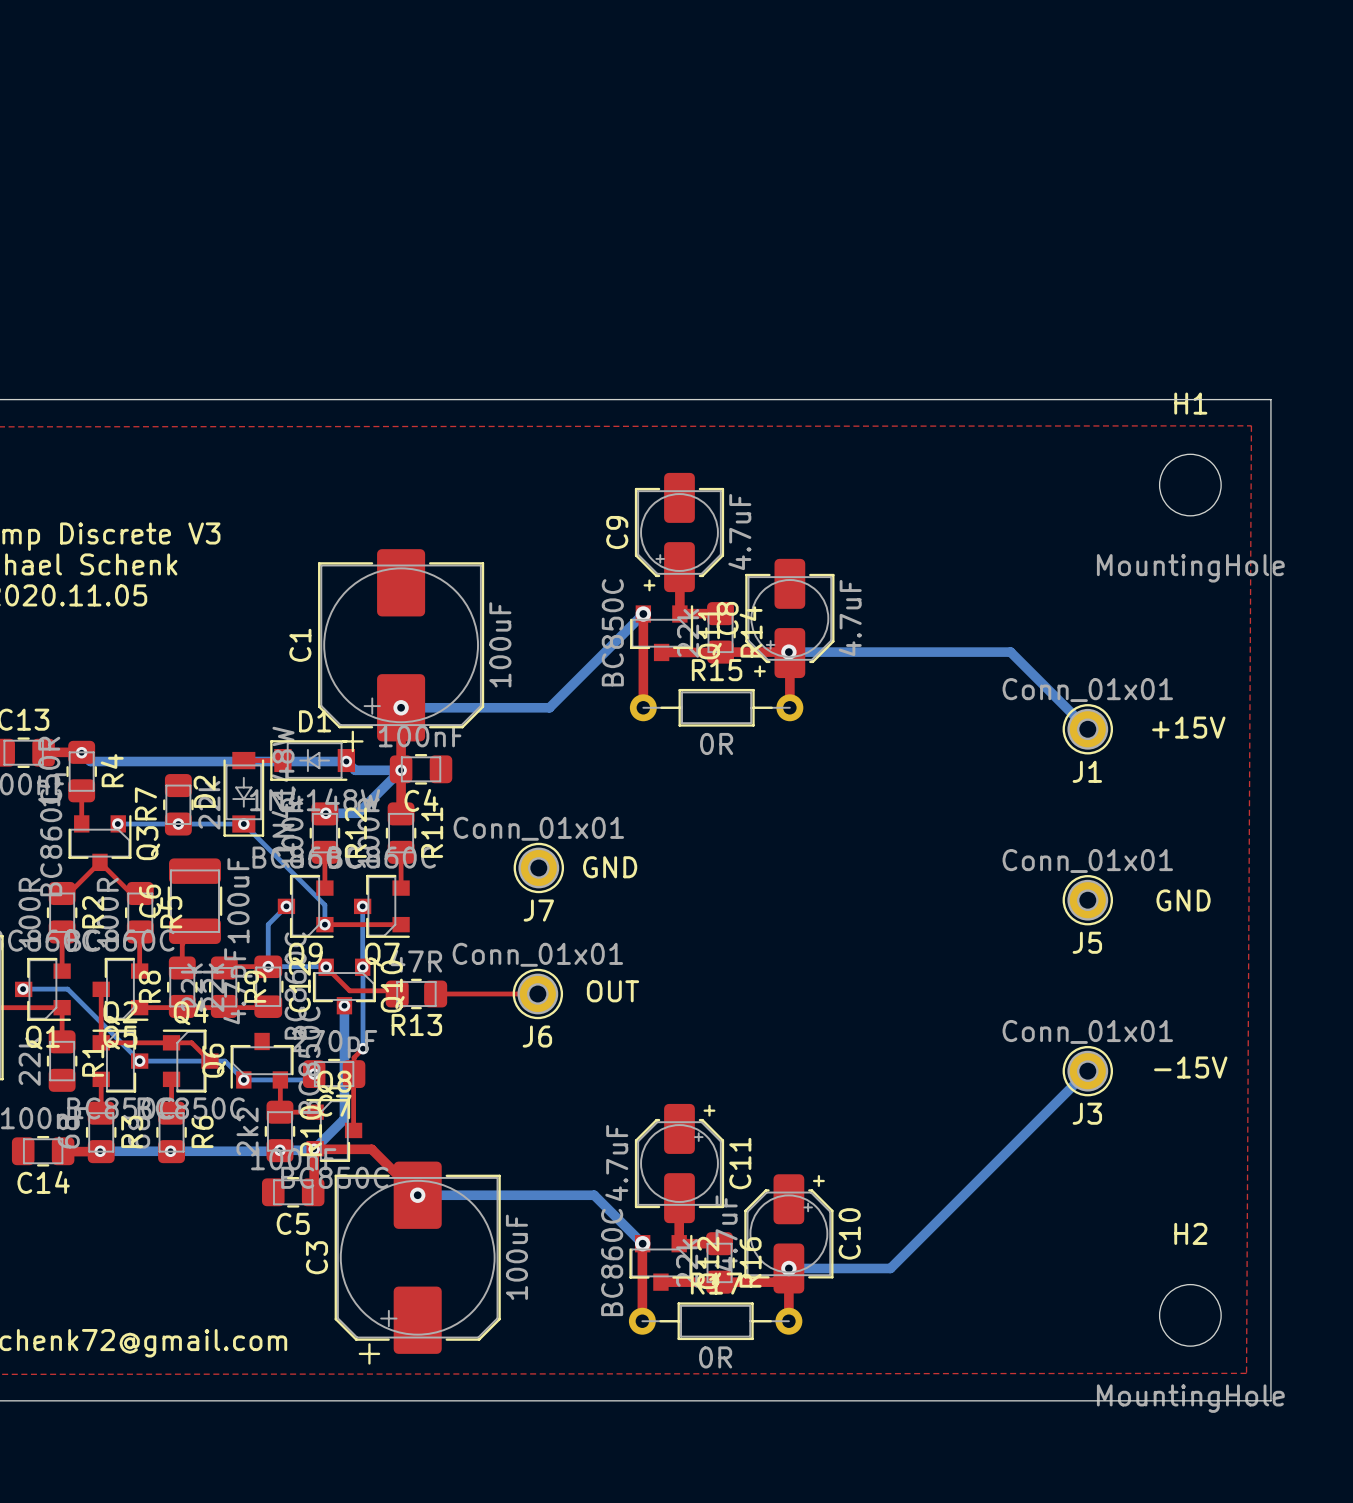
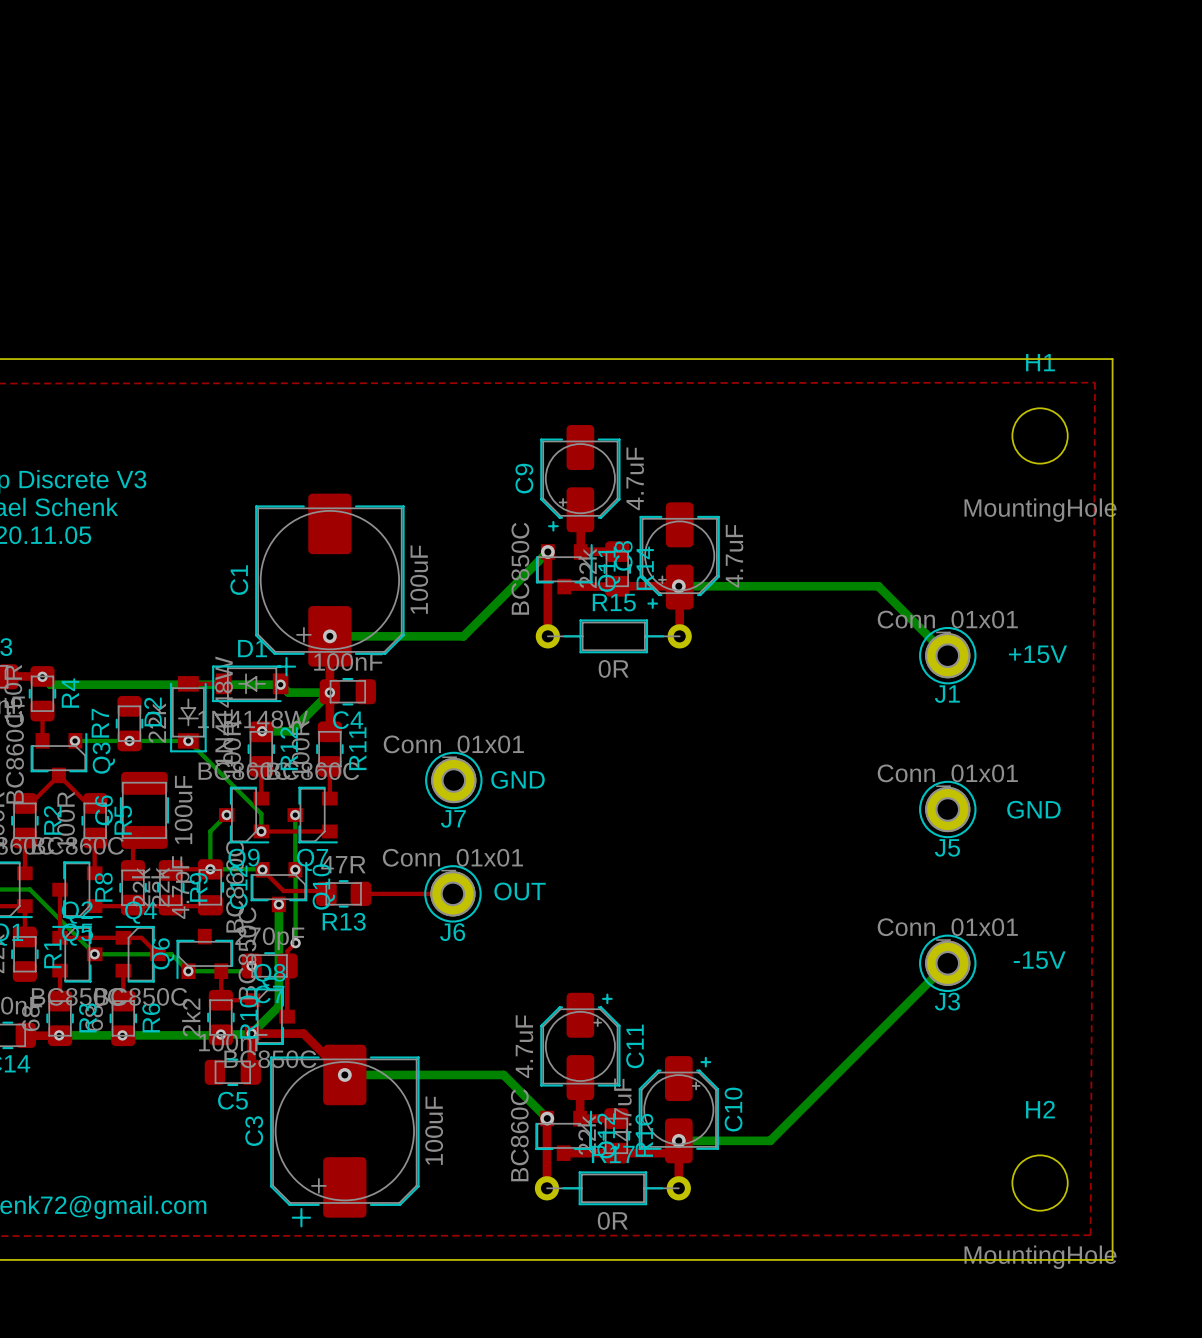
J1 footprint: [1062, 704, 1114, 755] -> [919, 626, 977, 685]
J7 footprint: [513, 842, 565, 894] -> [425, 751, 483, 810]
J5 footprint: [1062, 875, 1114, 926] -> [919, 780, 977, 839]
J6 footprint: [512, 968, 564, 1020] -> [424, 865, 482, 923]
J3 footprint: [1062, 1045, 1114, 1097] -> [919, 934, 977, 993]

